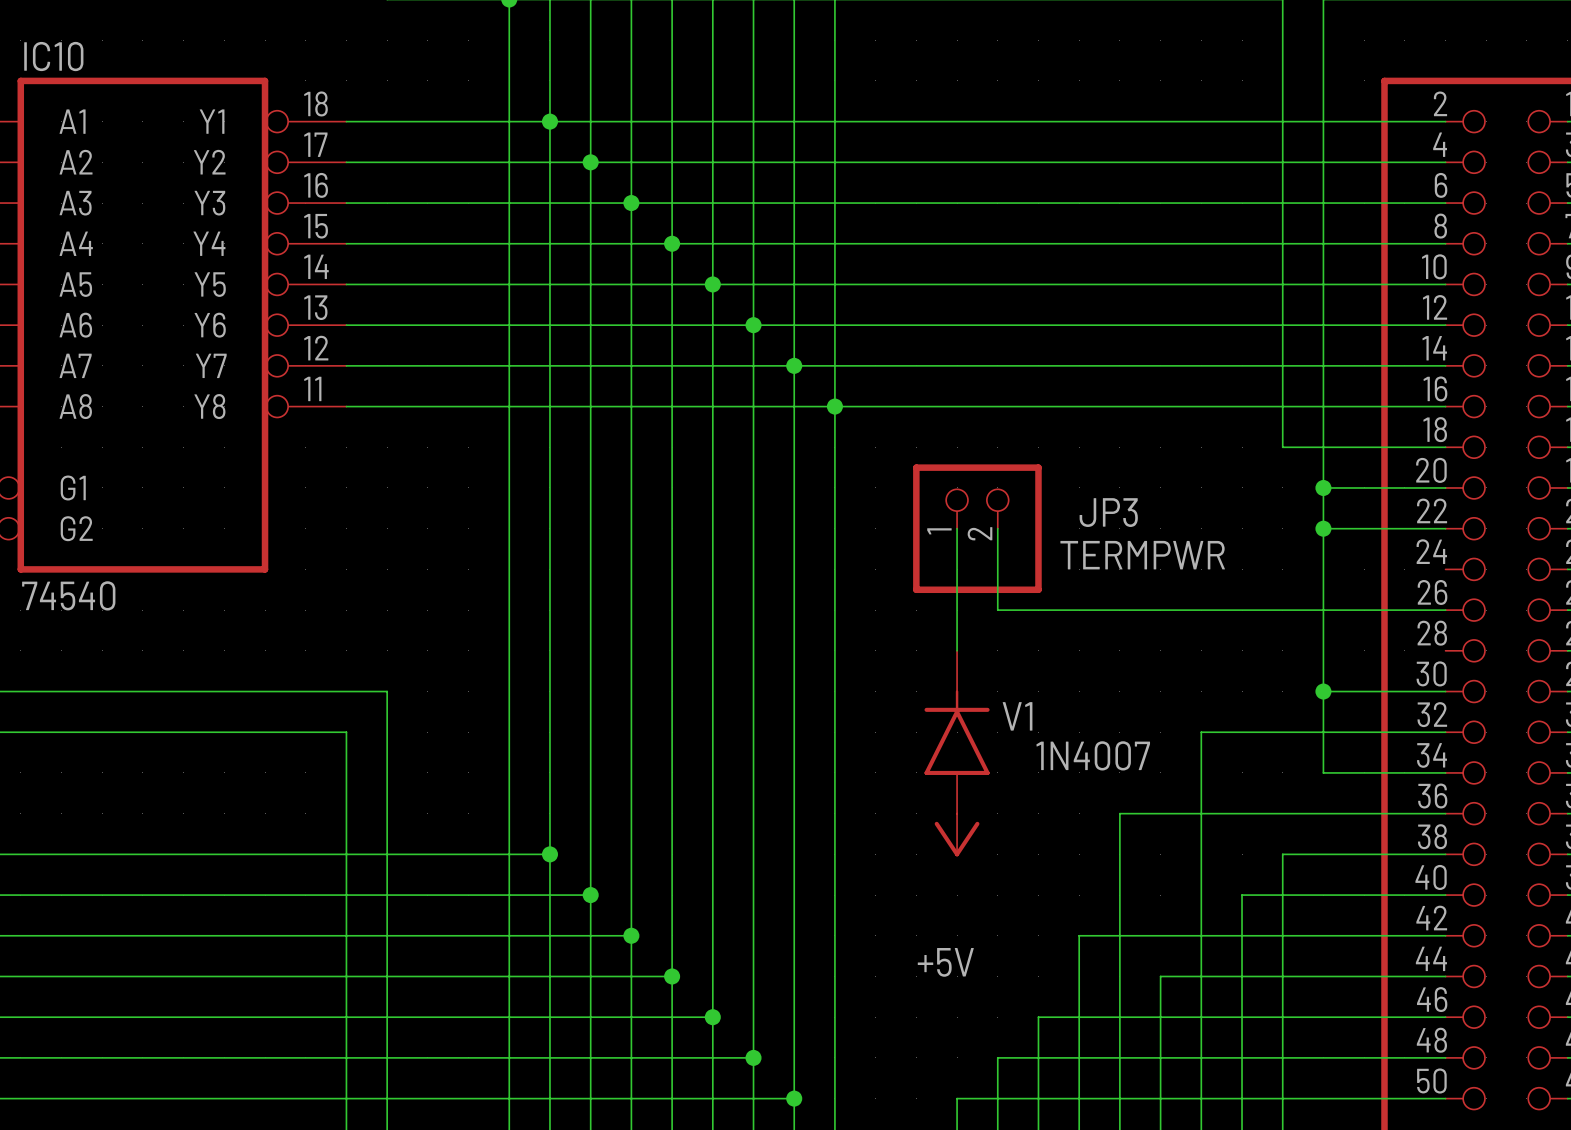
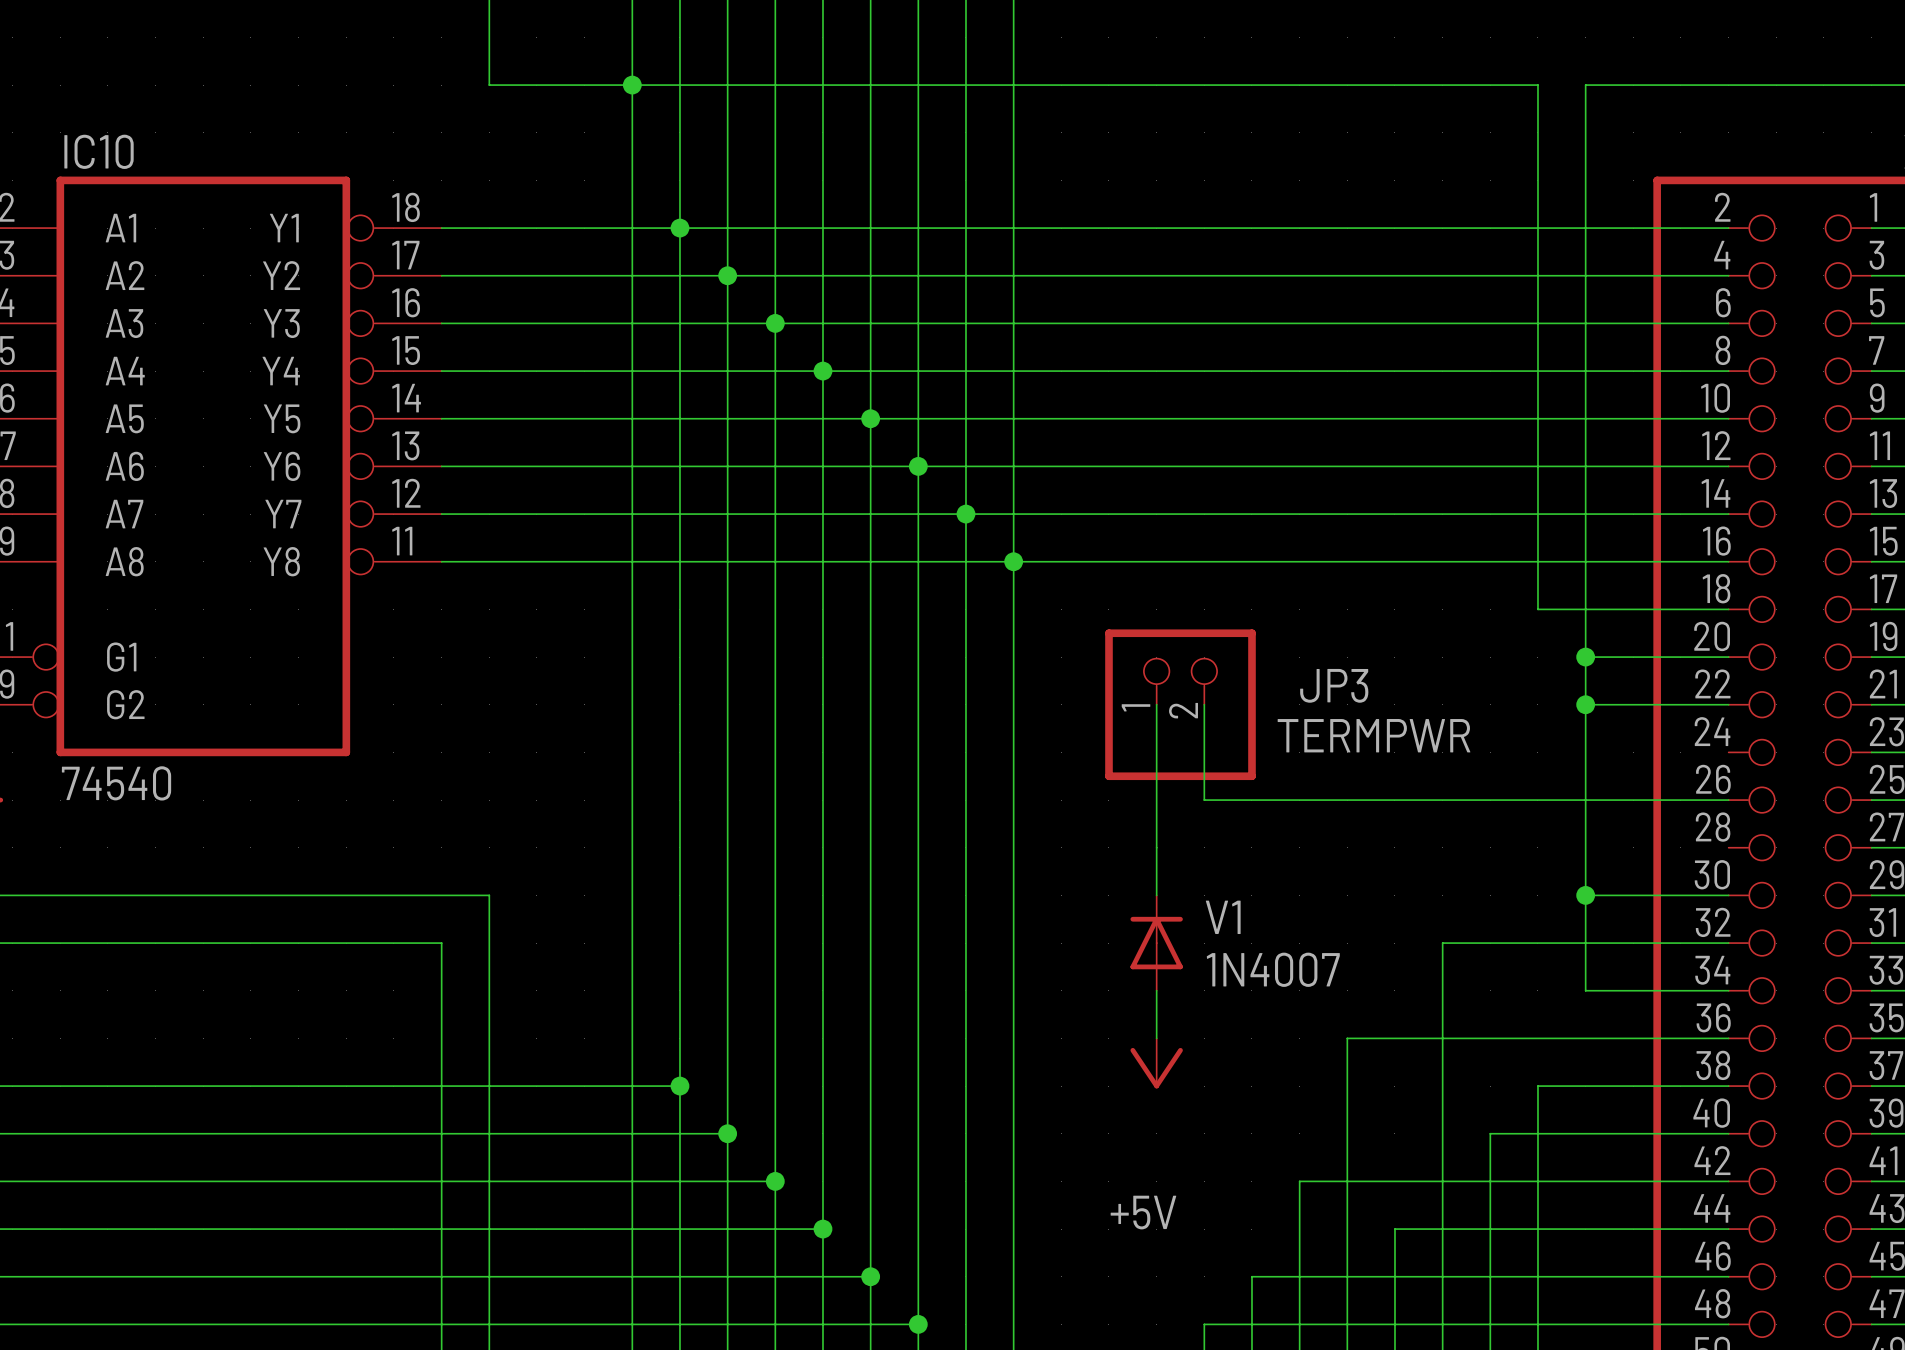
V1 symbol: [924, 650, 990, 814] -> [1130, 895, 1183, 991]

